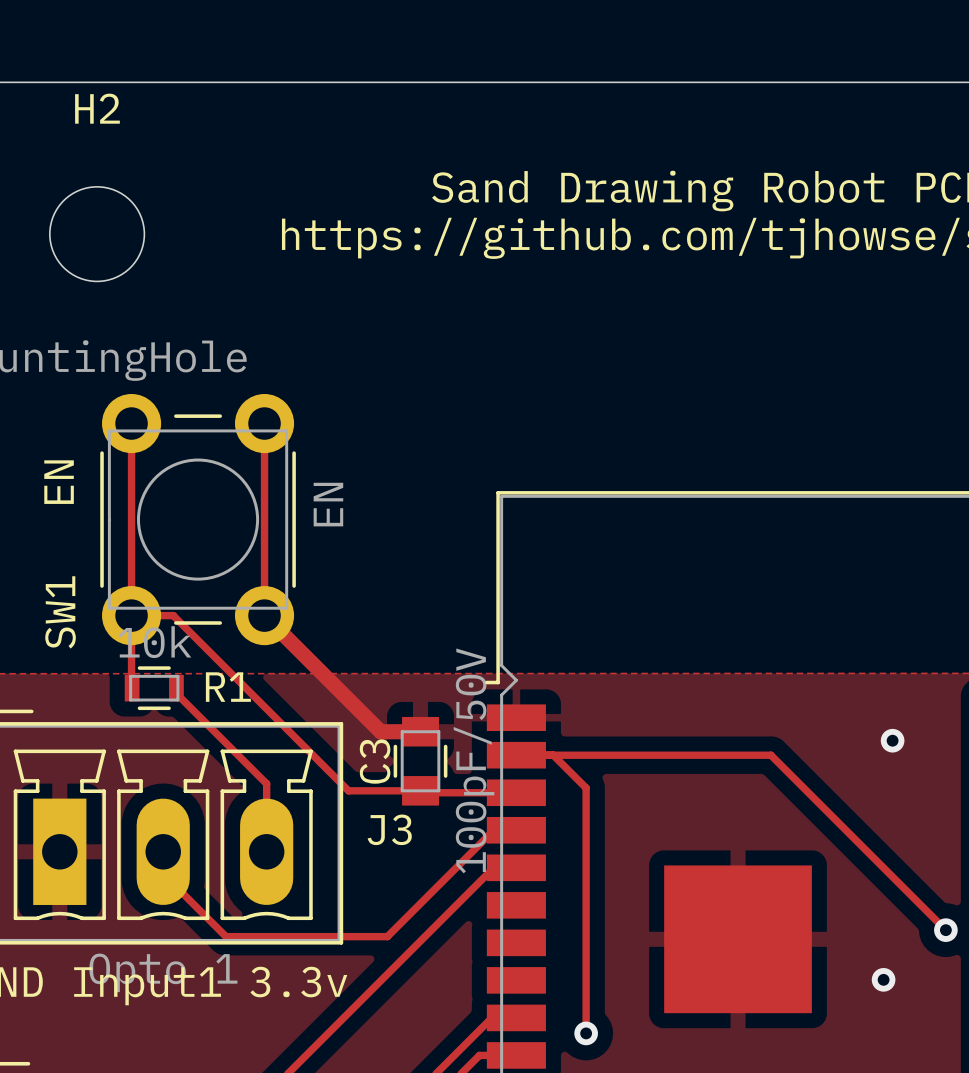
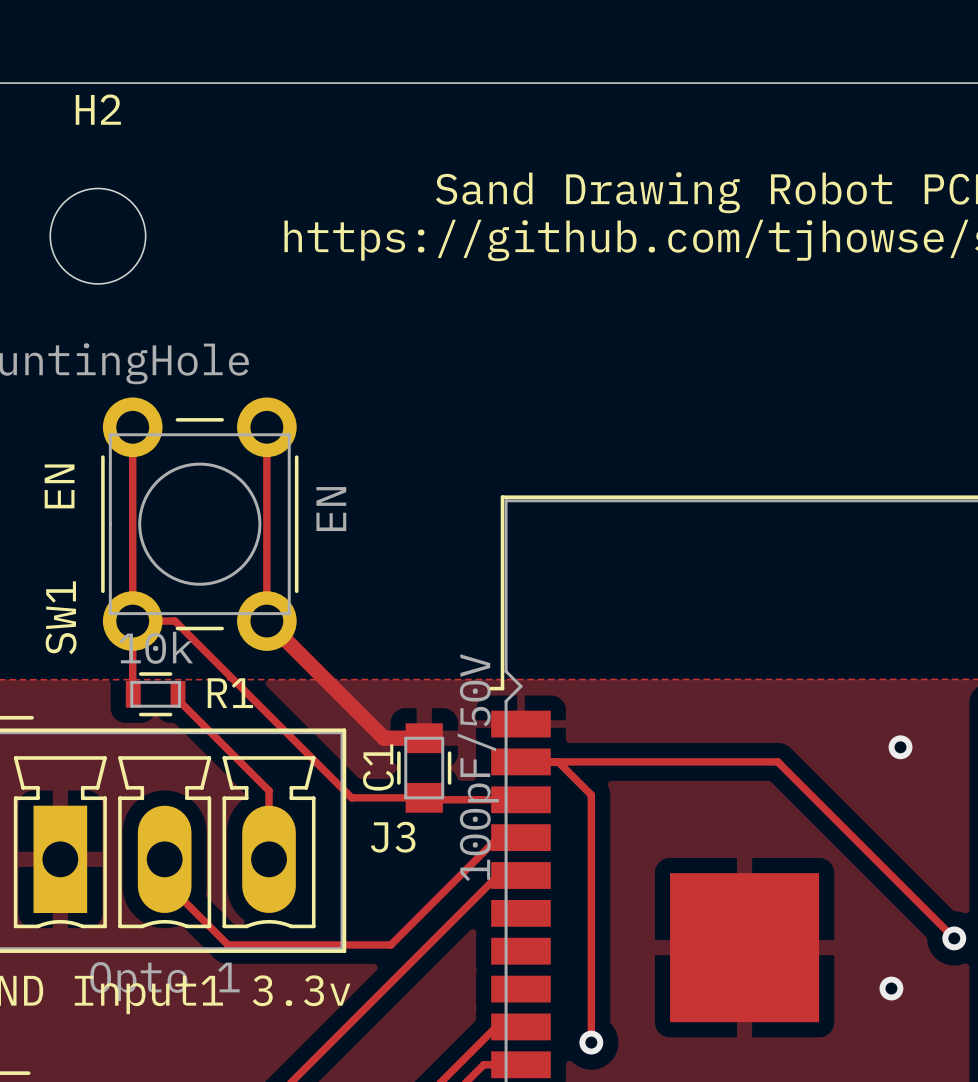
C3 name: C3 (375, 761) -> C1 (378, 767)

